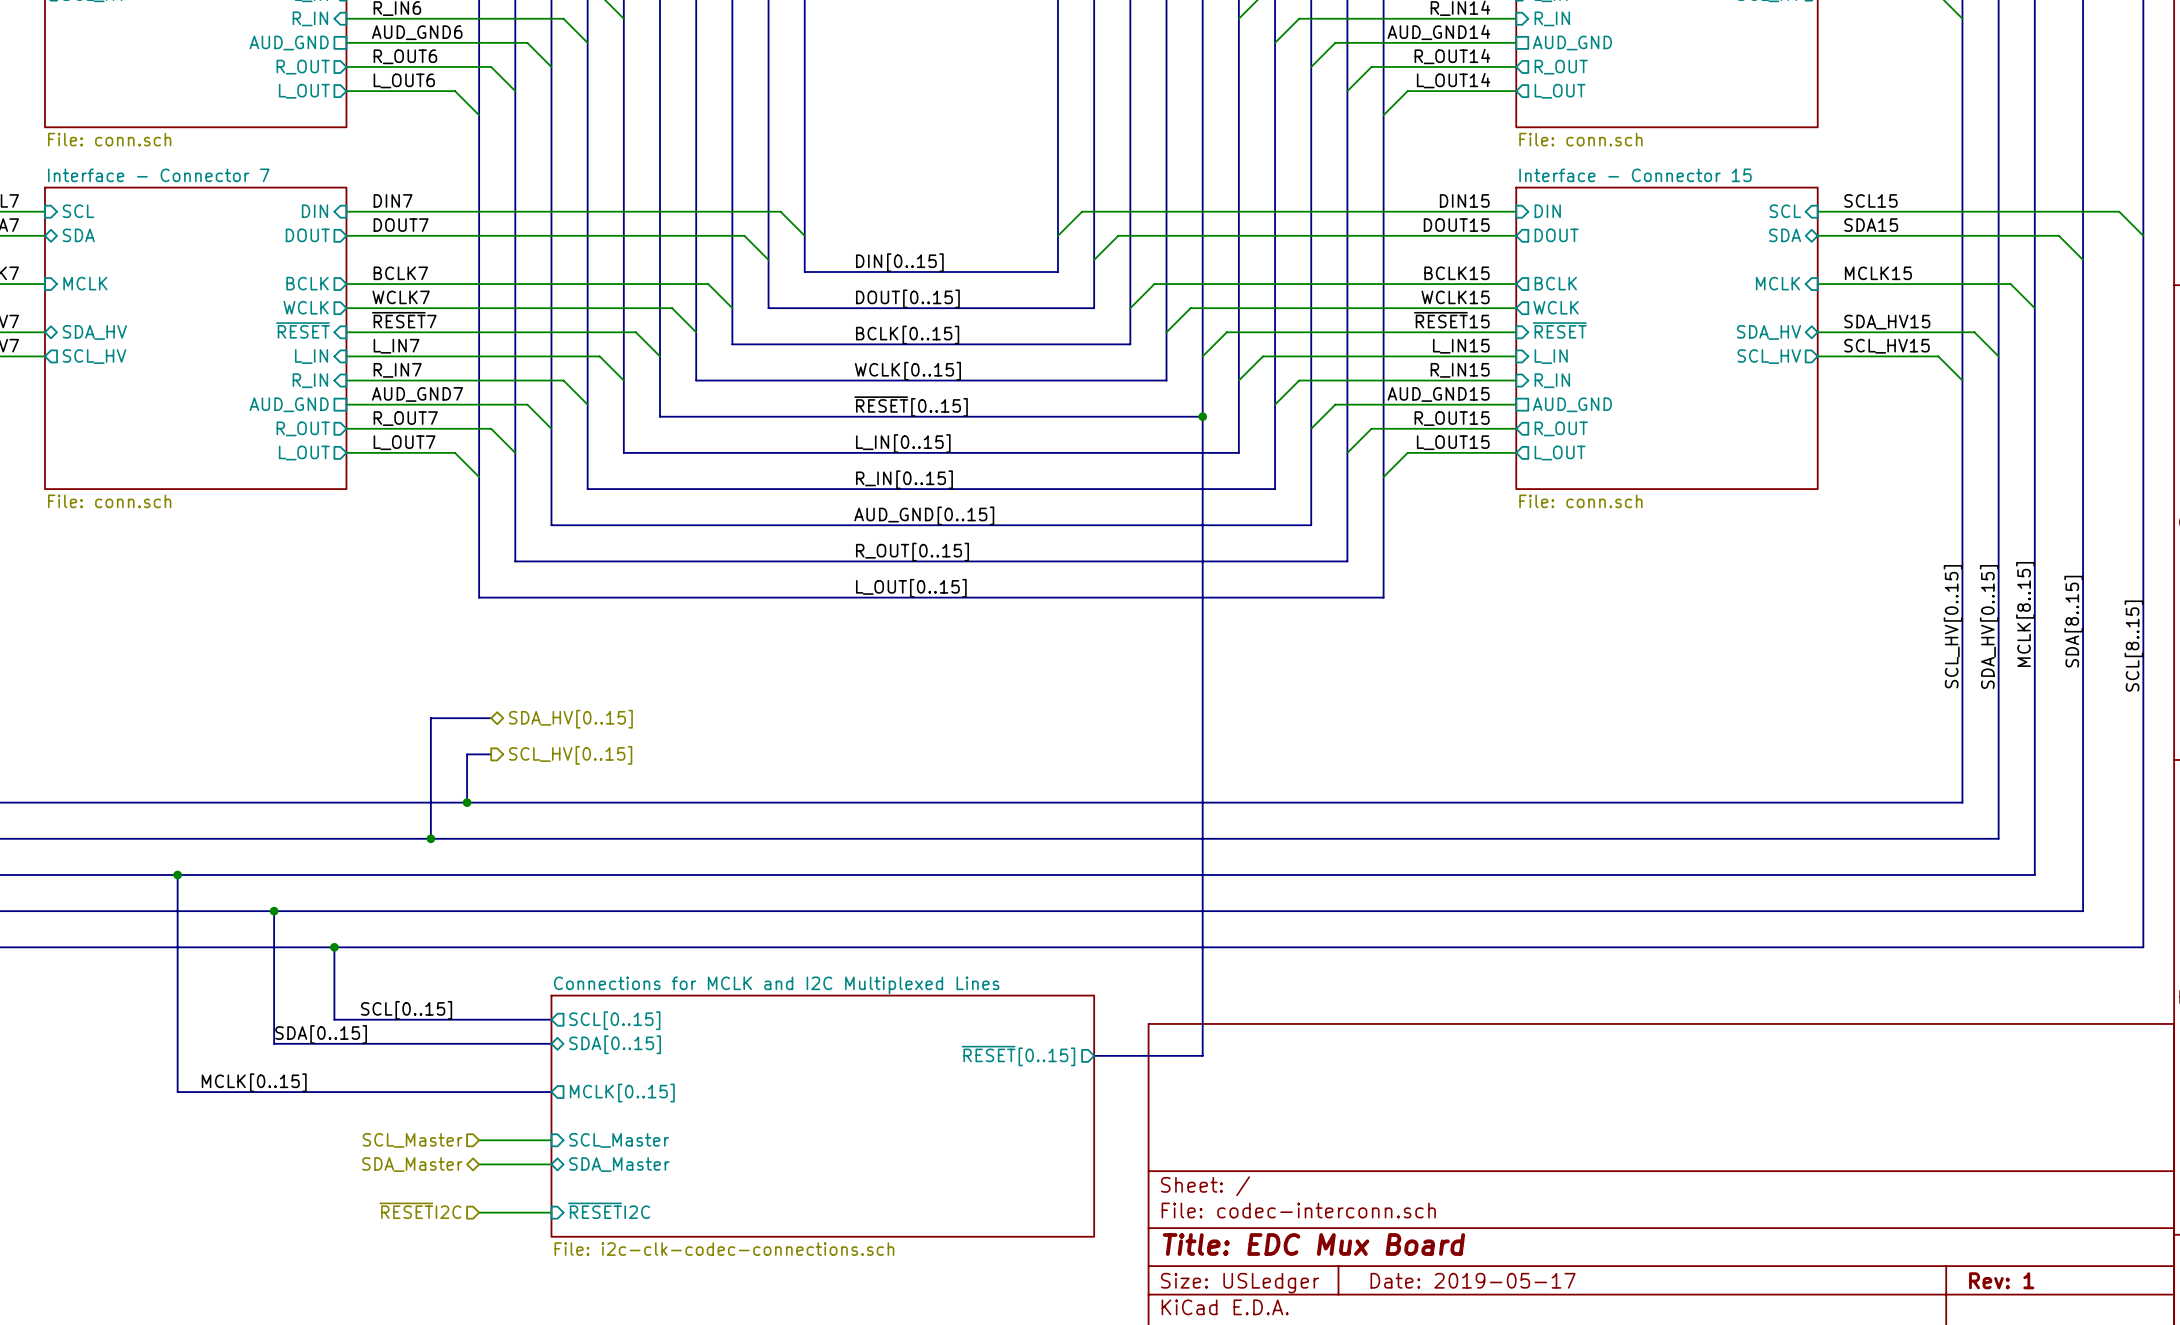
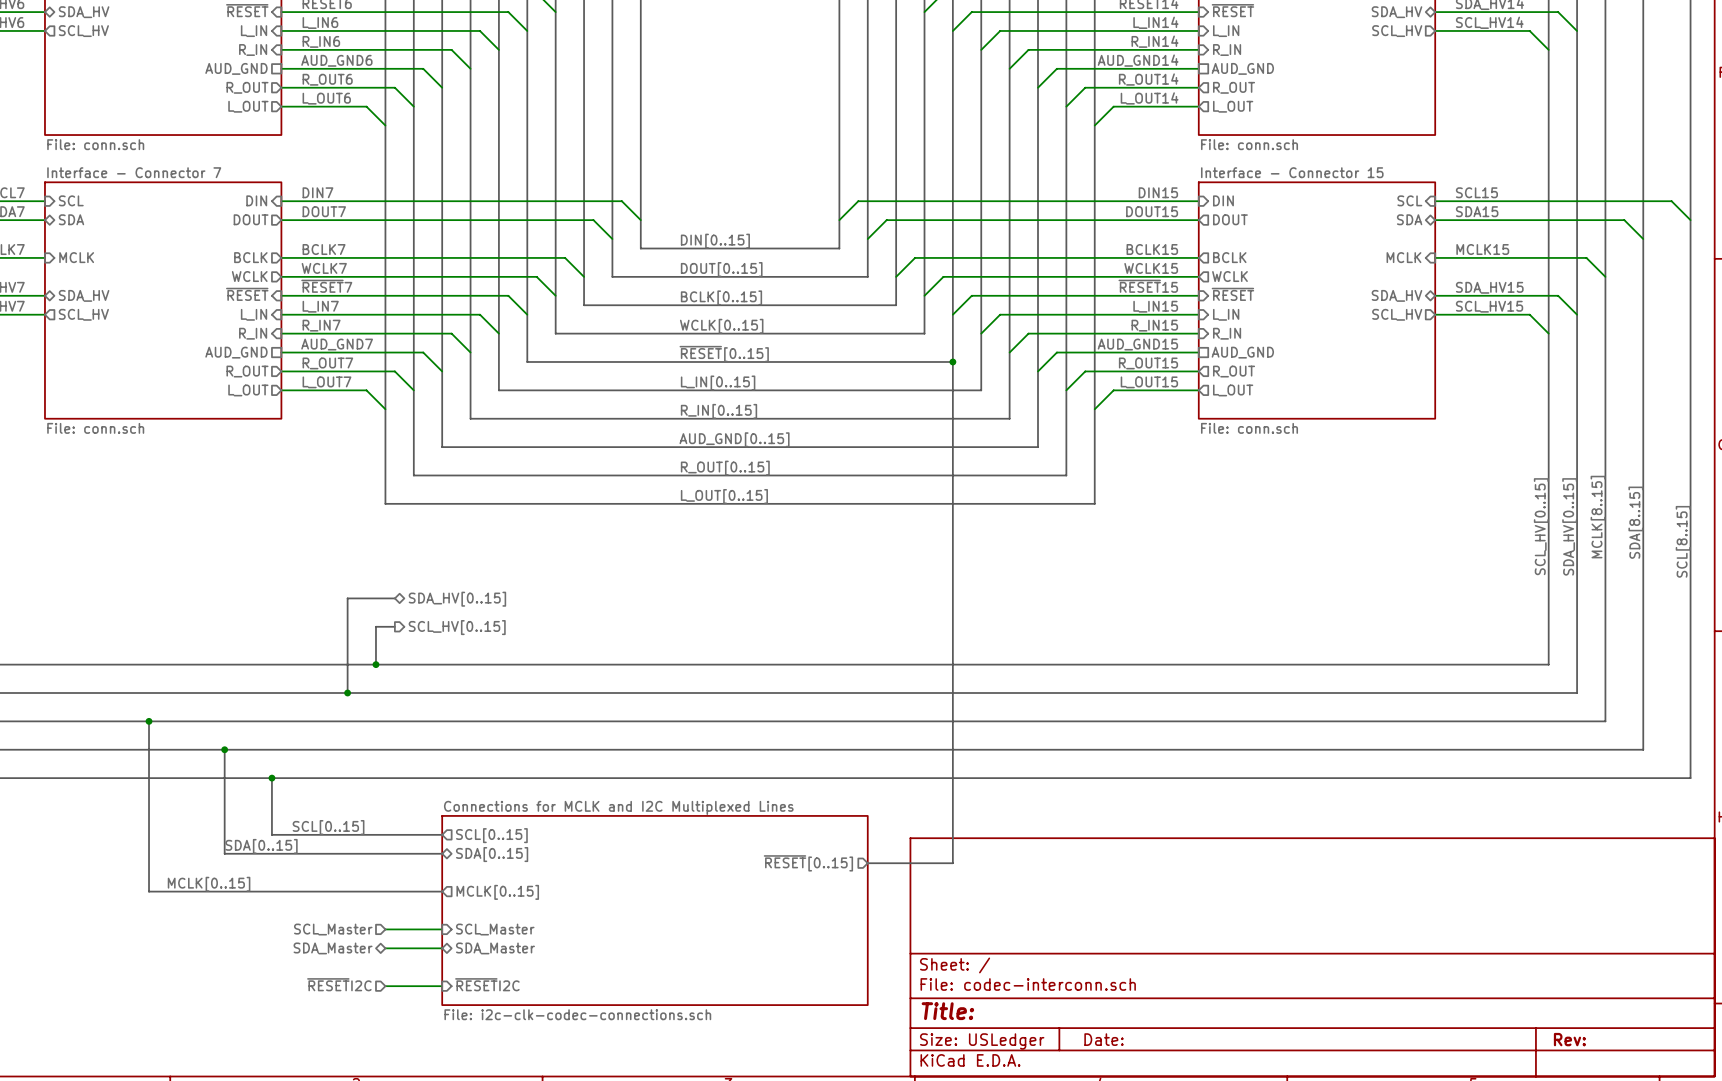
title block: Title: EDC Mux Board (1313, 1244) -> Title: (947, 1011)
title block: Date: 2019-05-17 (1473, 1280) -> Date: (1104, 1039)
title block: Rev: 1 (2001, 1280) -> Rev: (1569, 1039)

